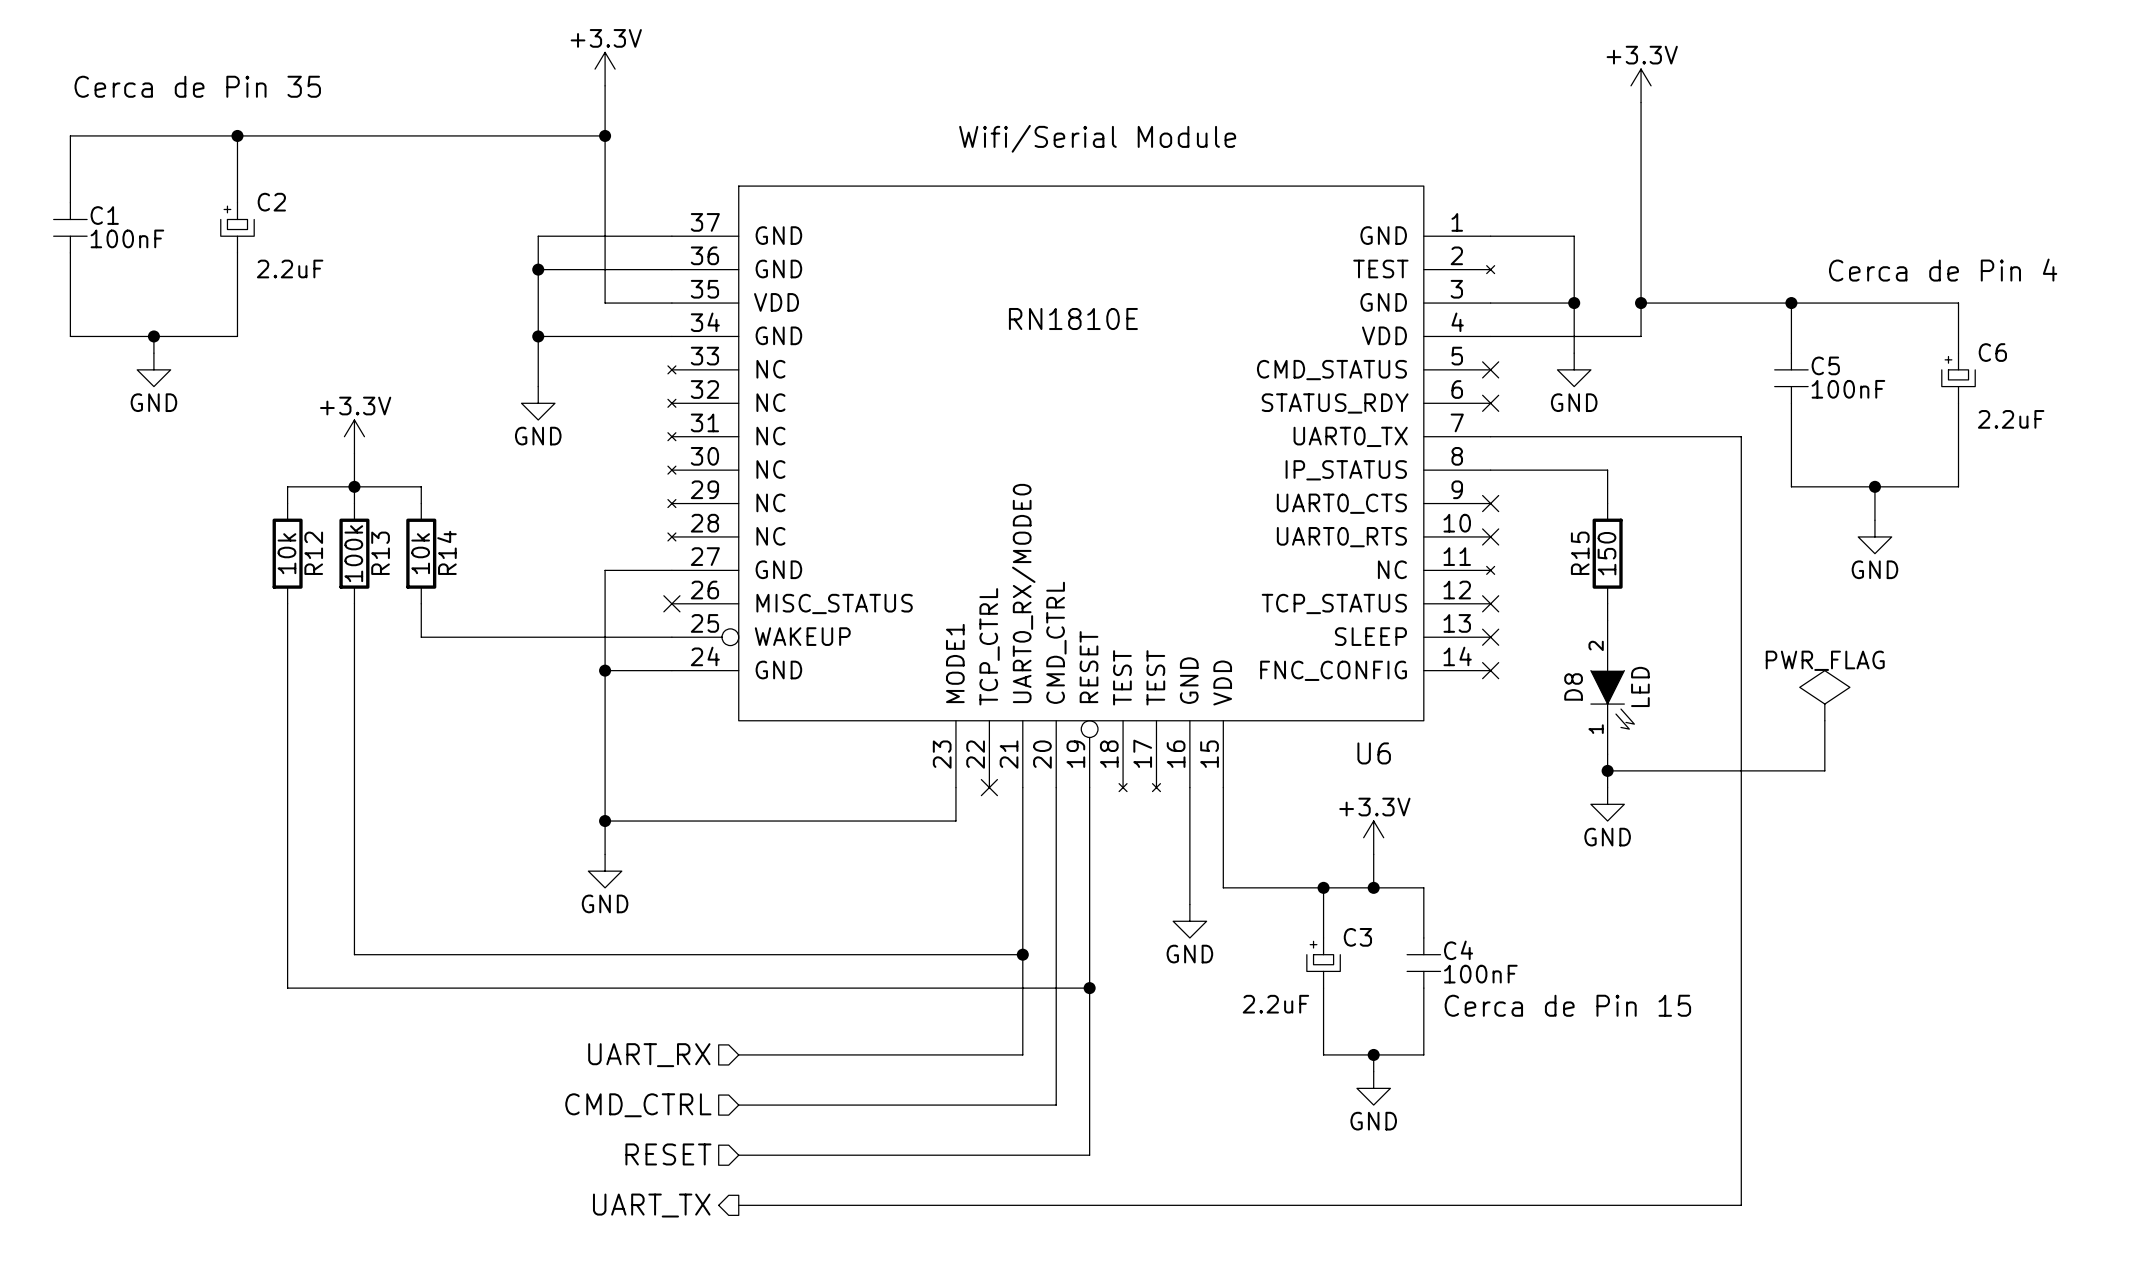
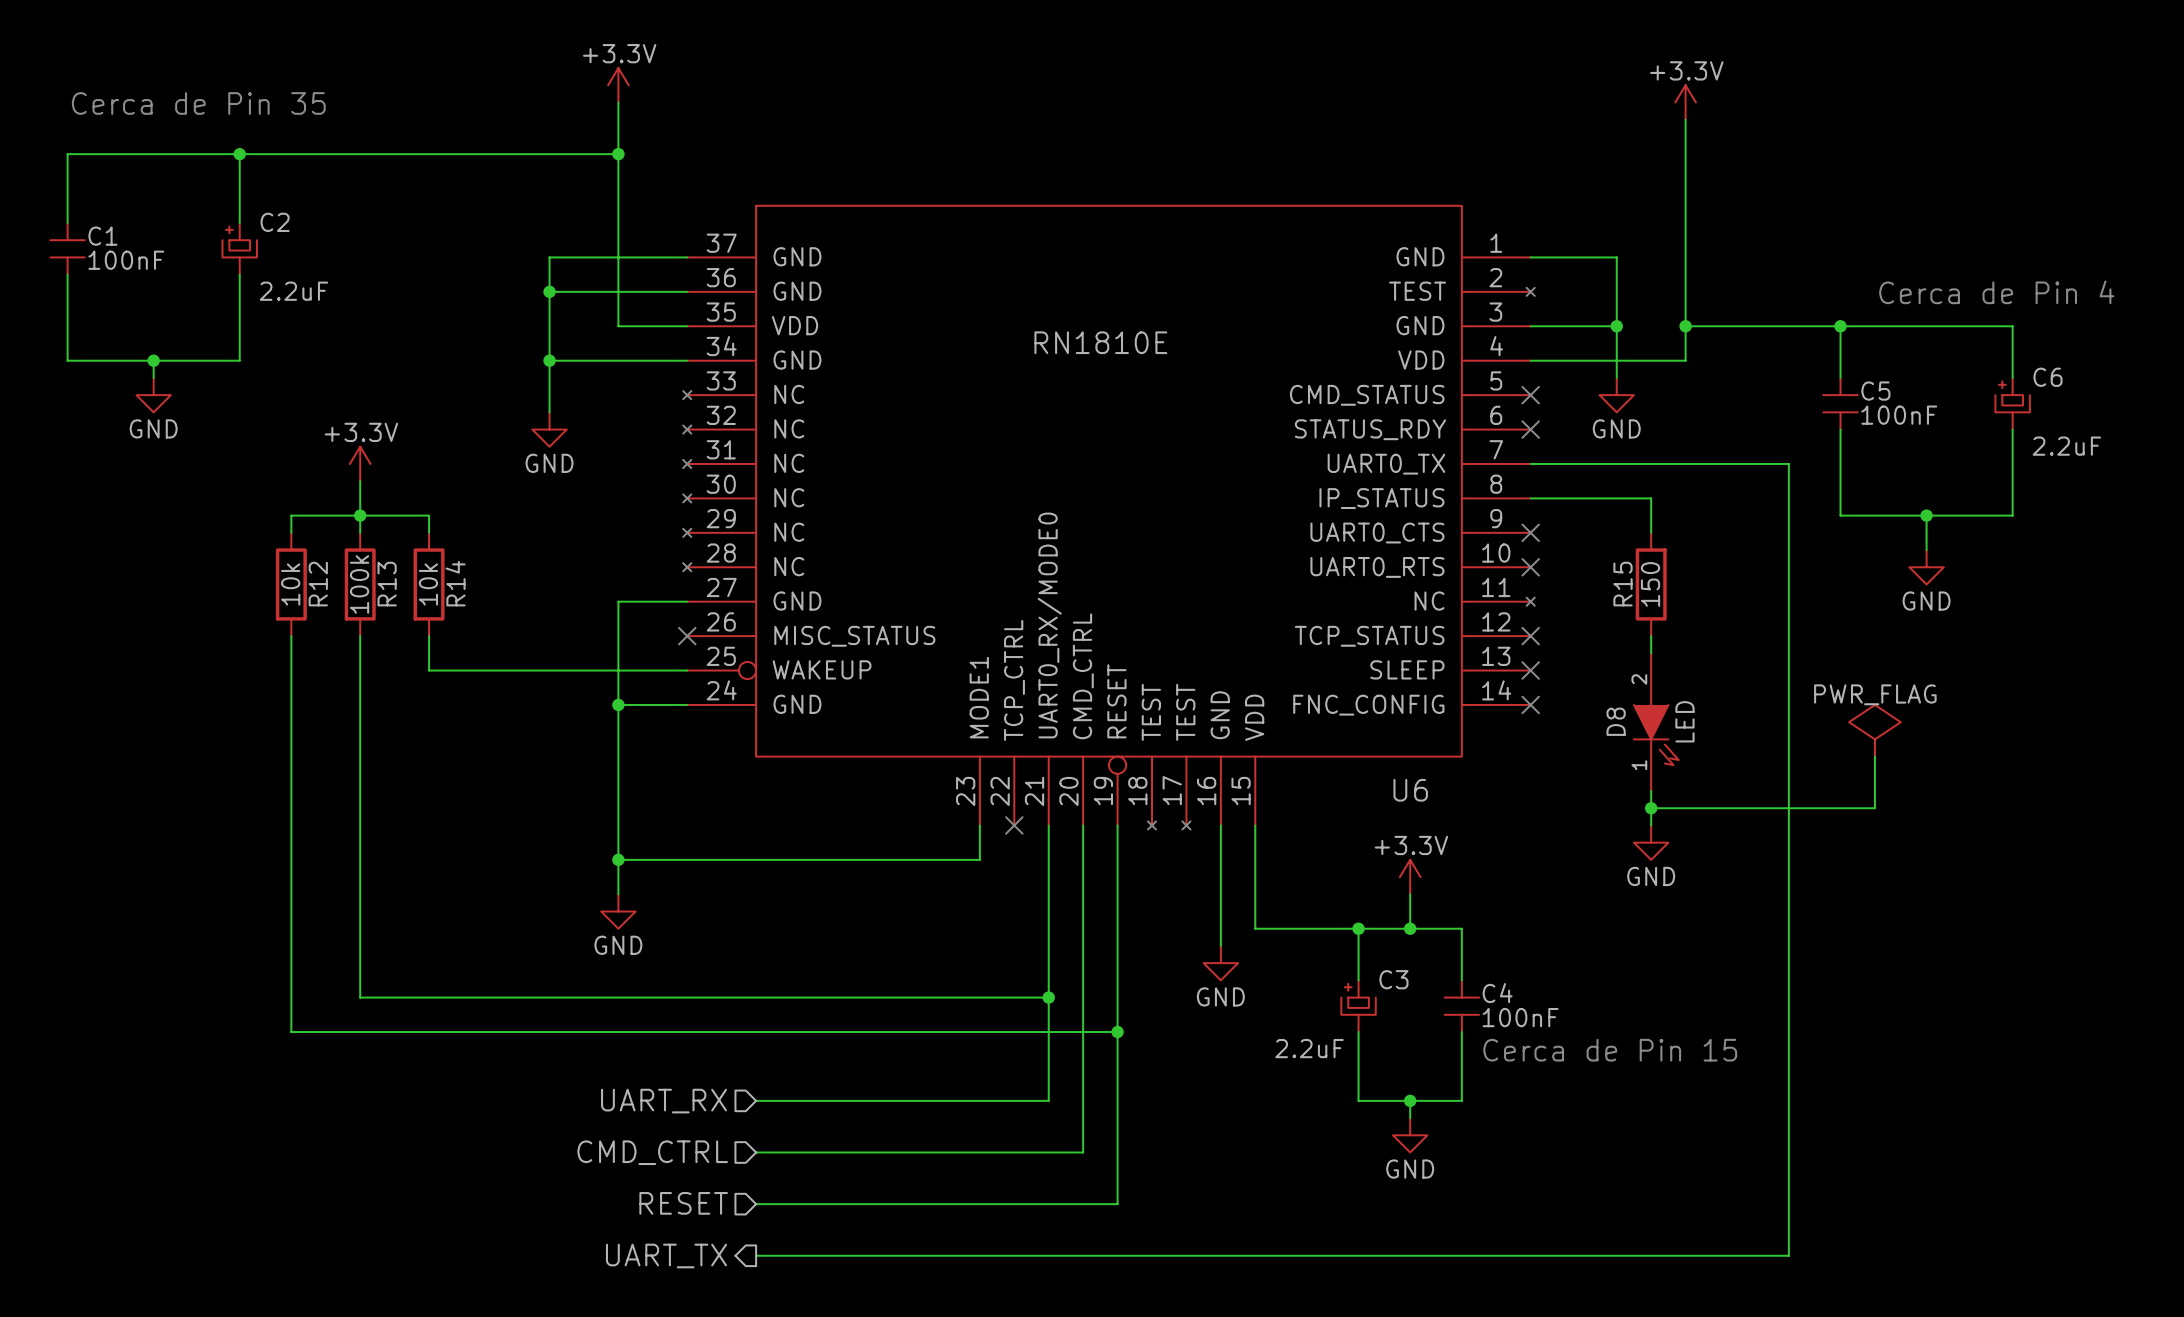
text: Wifi/Serial Module (1097, 138) -> none

